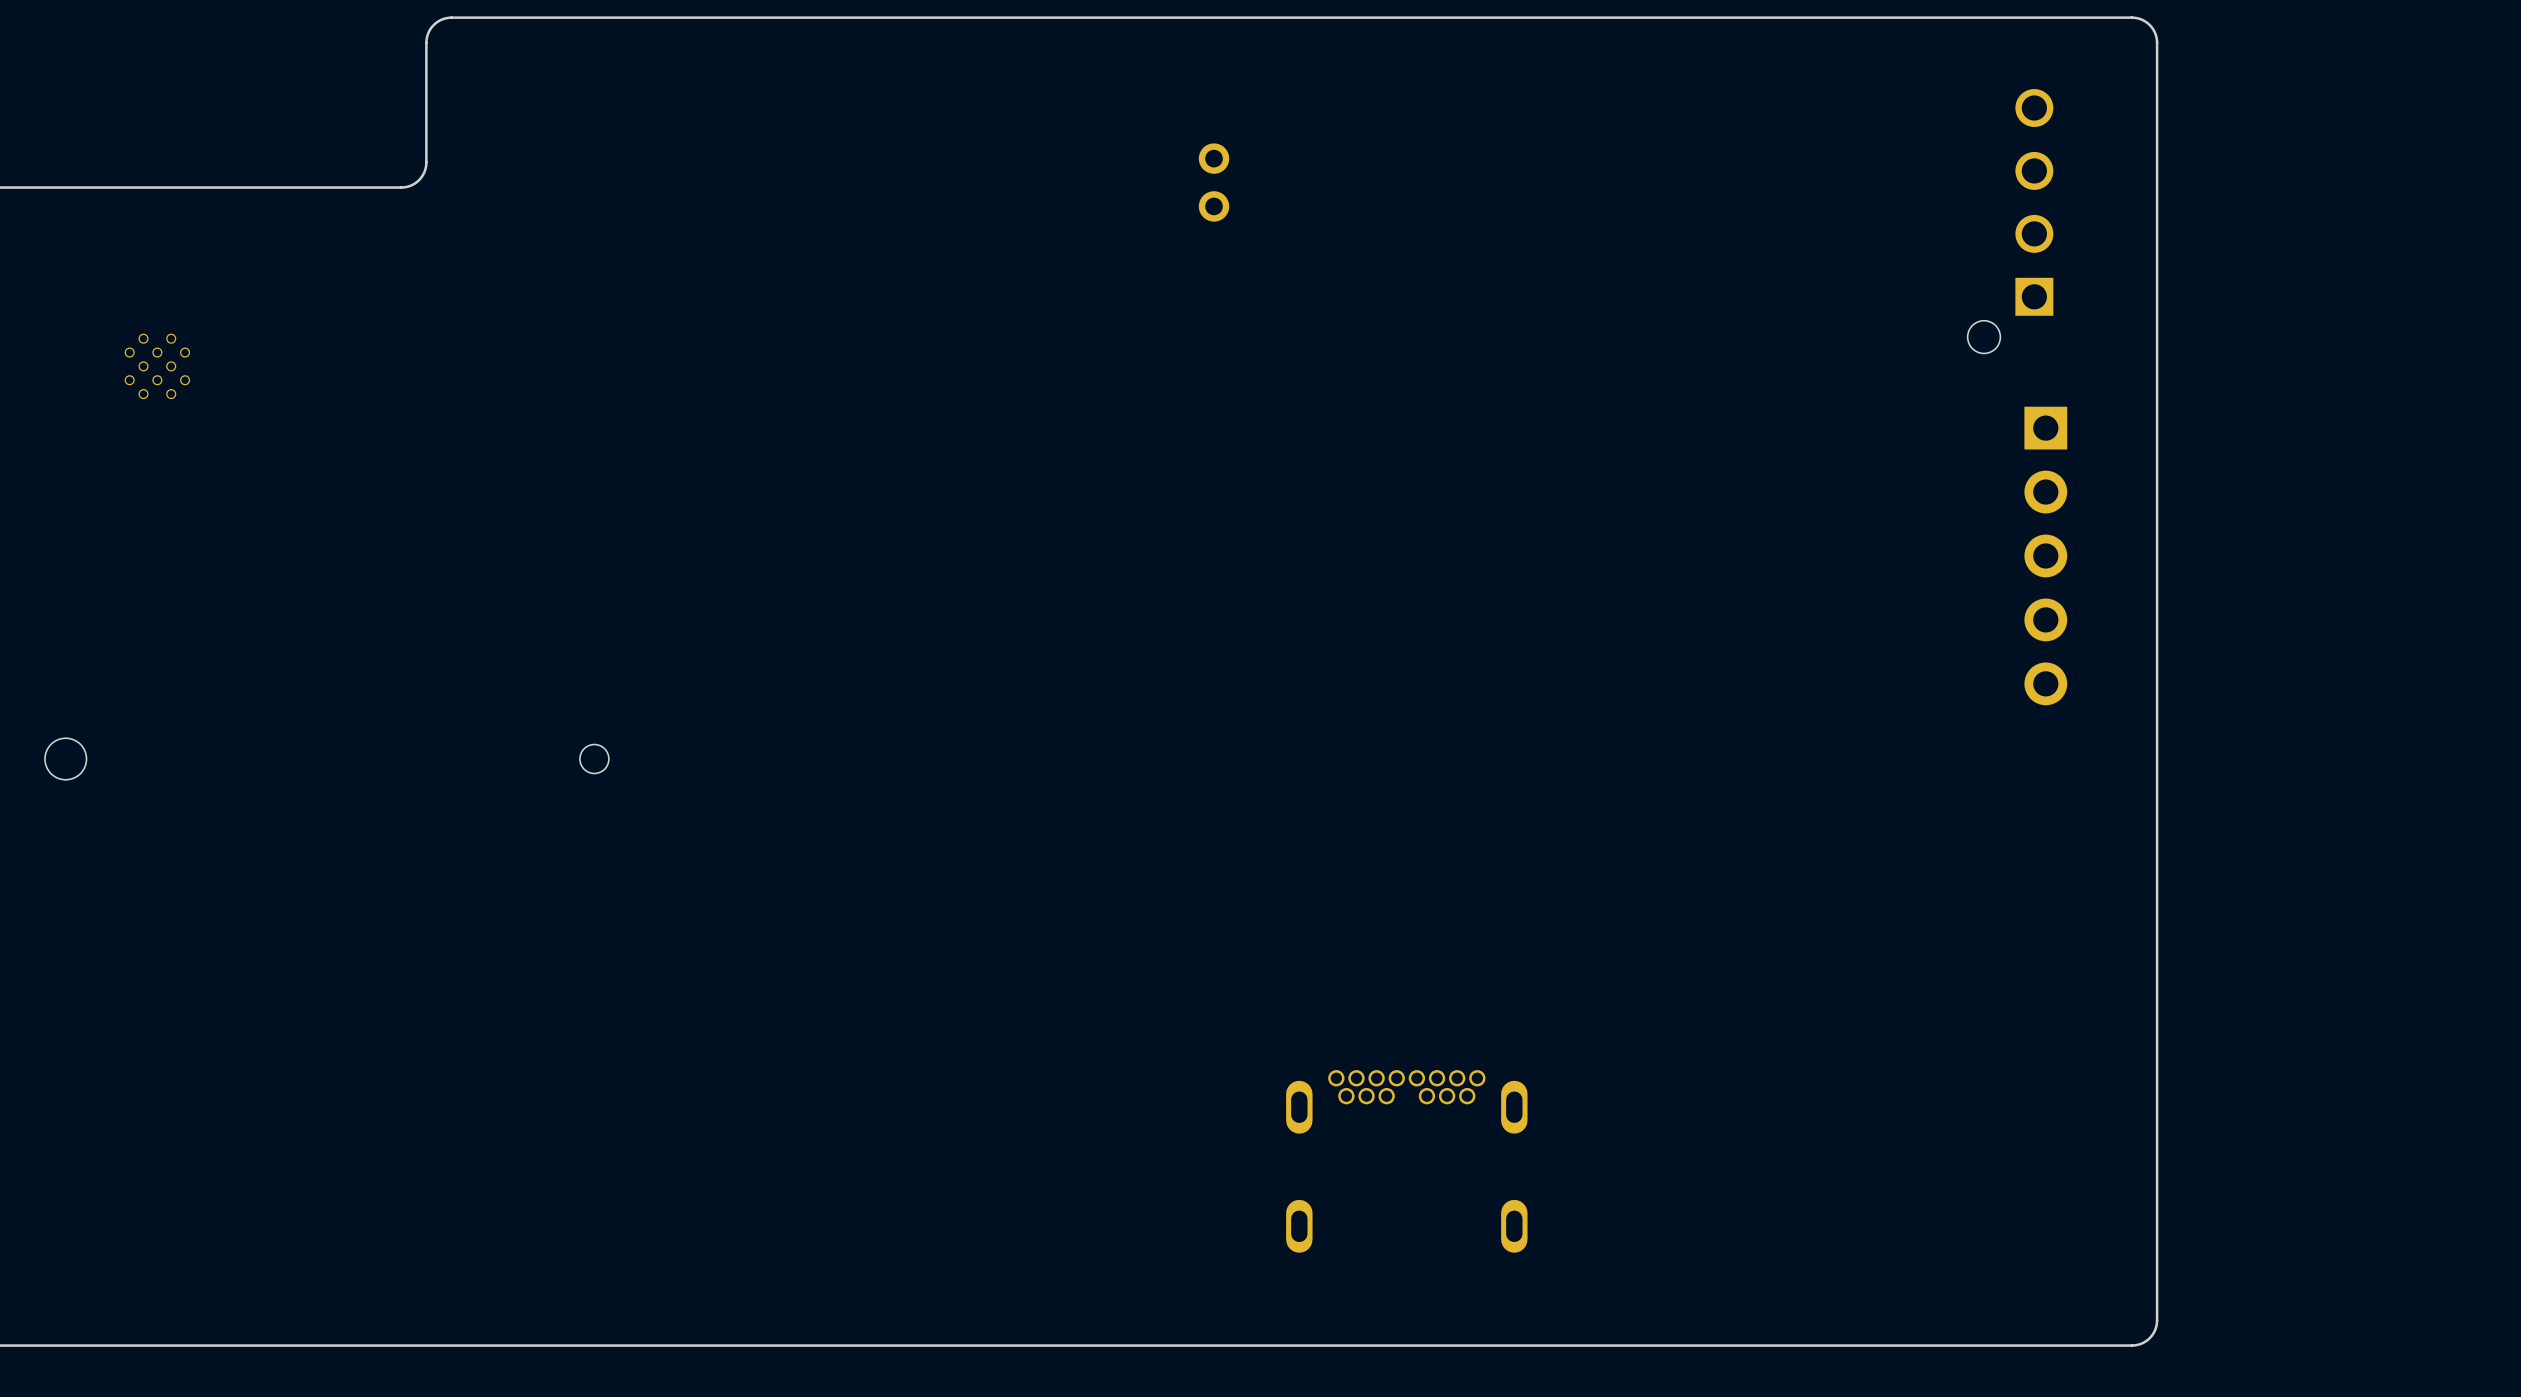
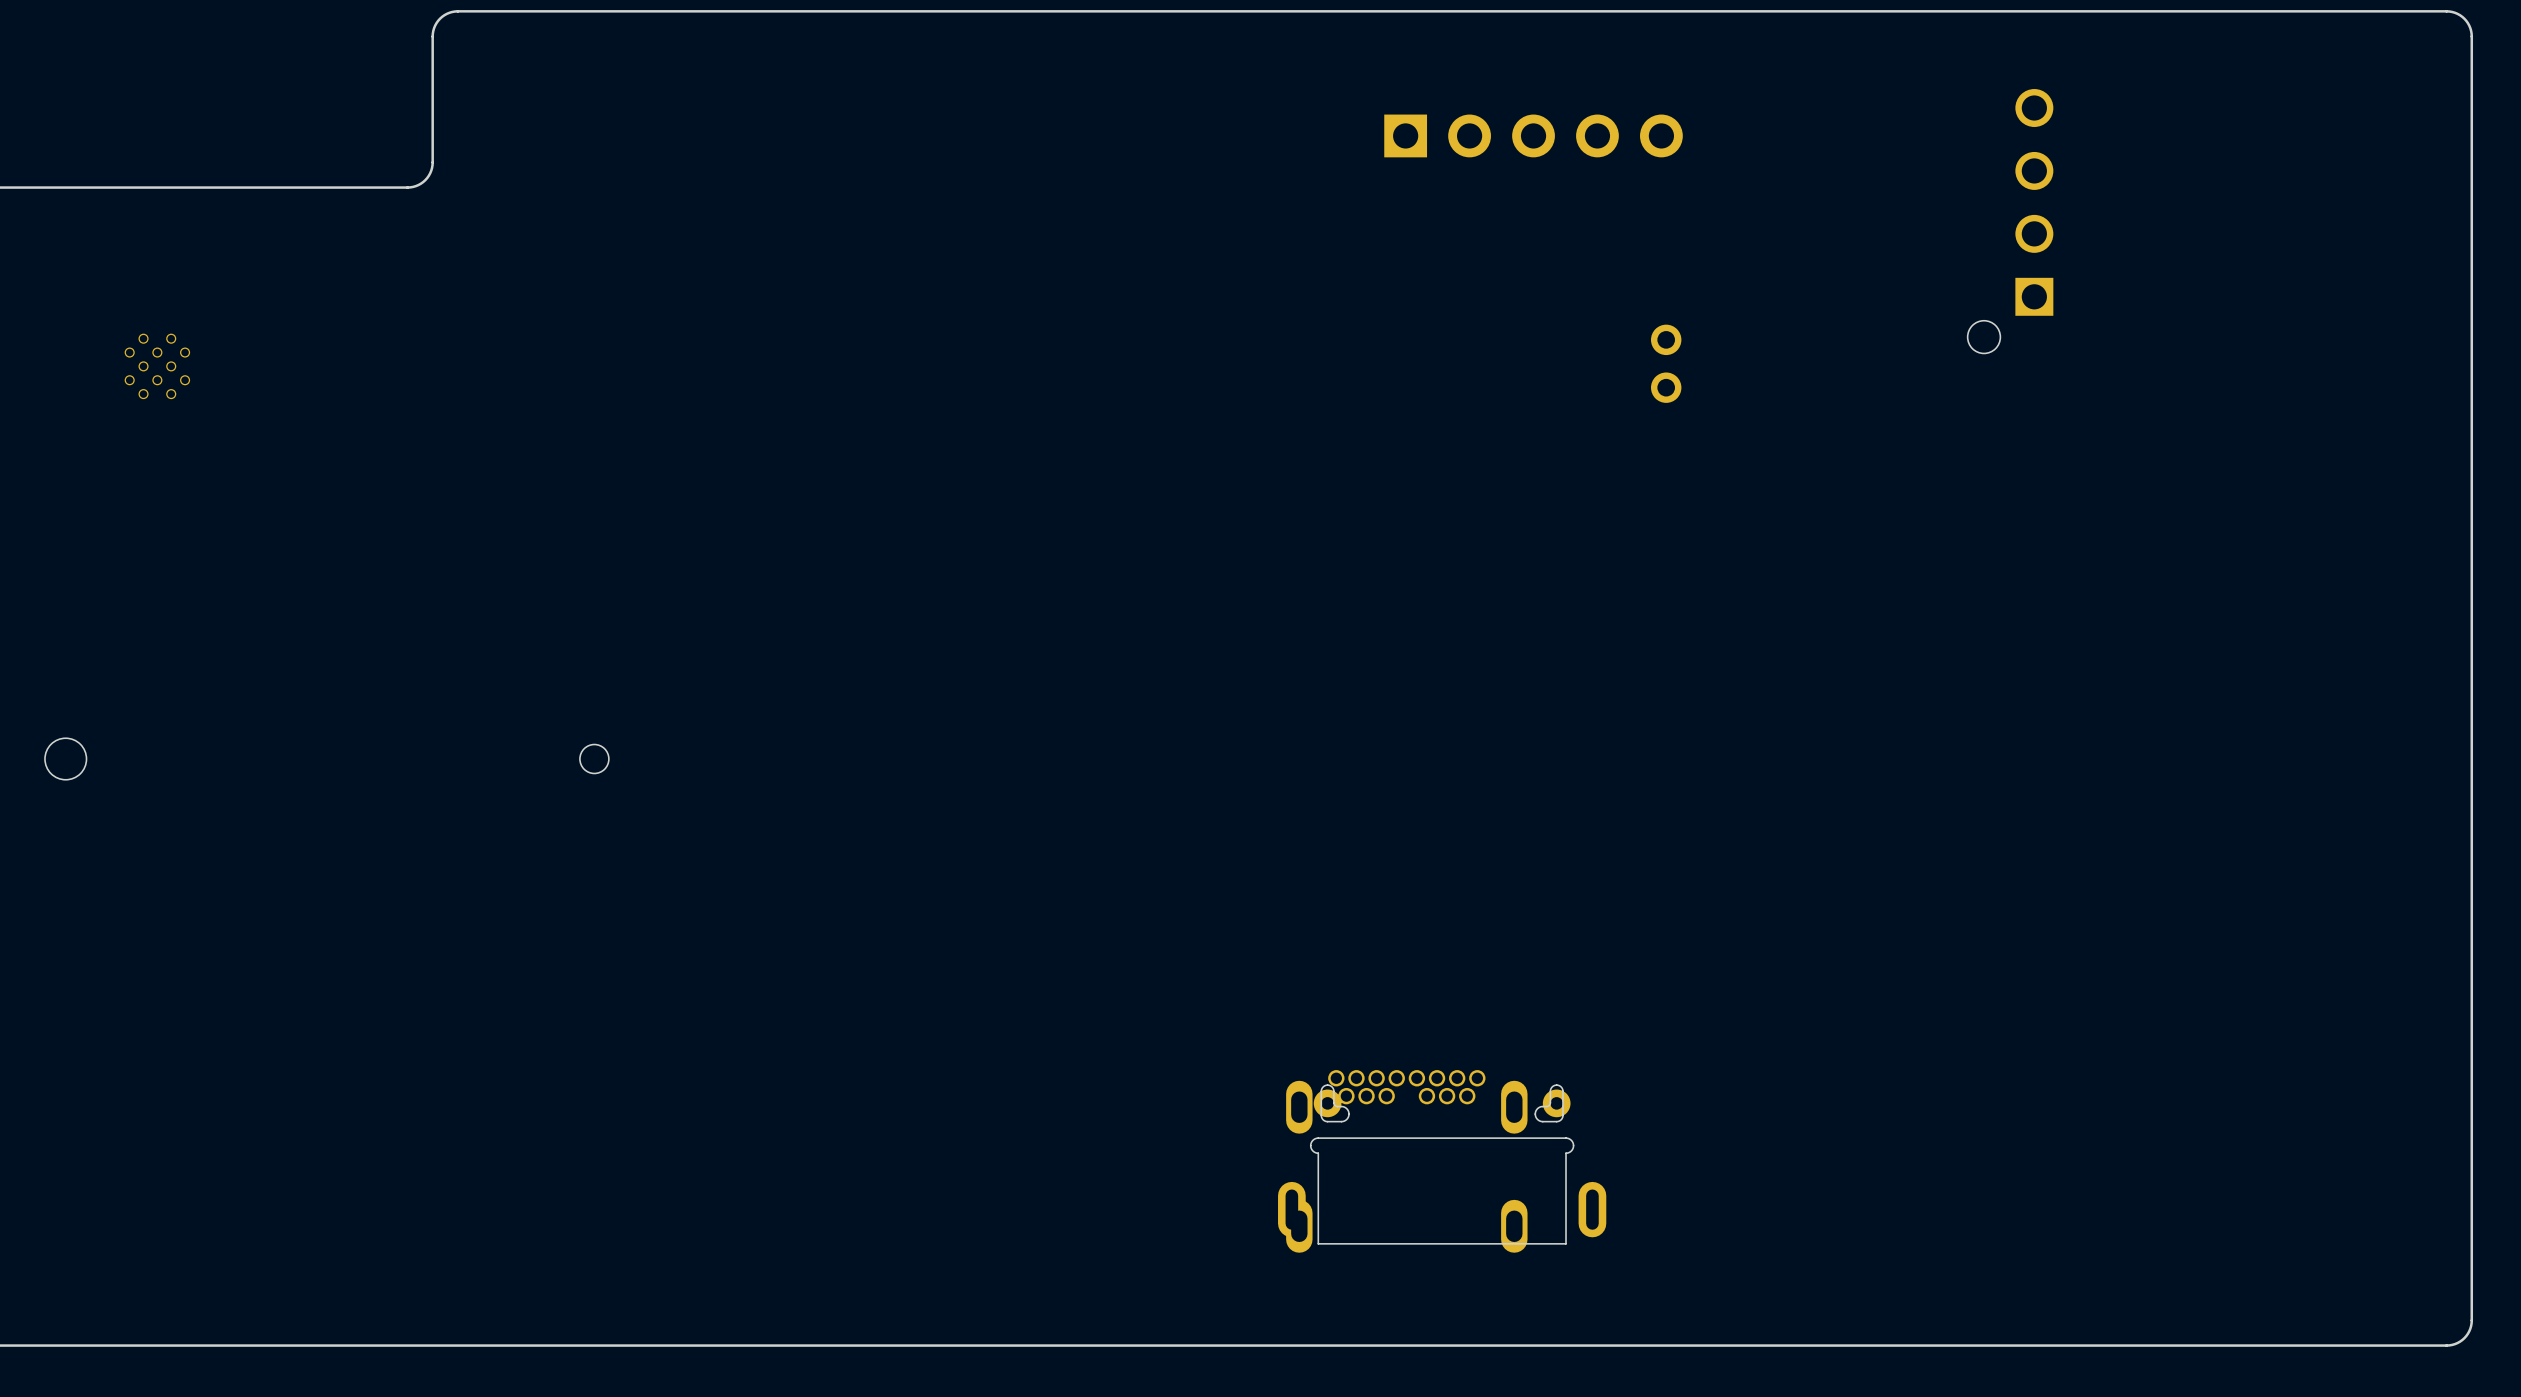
part: none -> (1533, 135)
part position: (1214, 182) -> (1666, 363)
board edge: (401, 187) (416, 182) (425, 167) (426, 39) (433, 25) (448, 17) (2131, 17) (2145, 21) (2154, 31) (2157, 42) (2157, 1320) (2154, 1331) (2149, 1338) (2142, 1343) (2131, 1345) -> (401, 187) (413, 186) (420, 183) (431, 170) (432, 33) (440, 18) (455, 11) (2446, 11) (2459, 15) (2469, 25) (2471, 36) (2471, 1325) (2462, 1340) (2449, 1345) (2131, 1345)
part: (2045, 555) -> none
part: none -> (1442, 1164)

